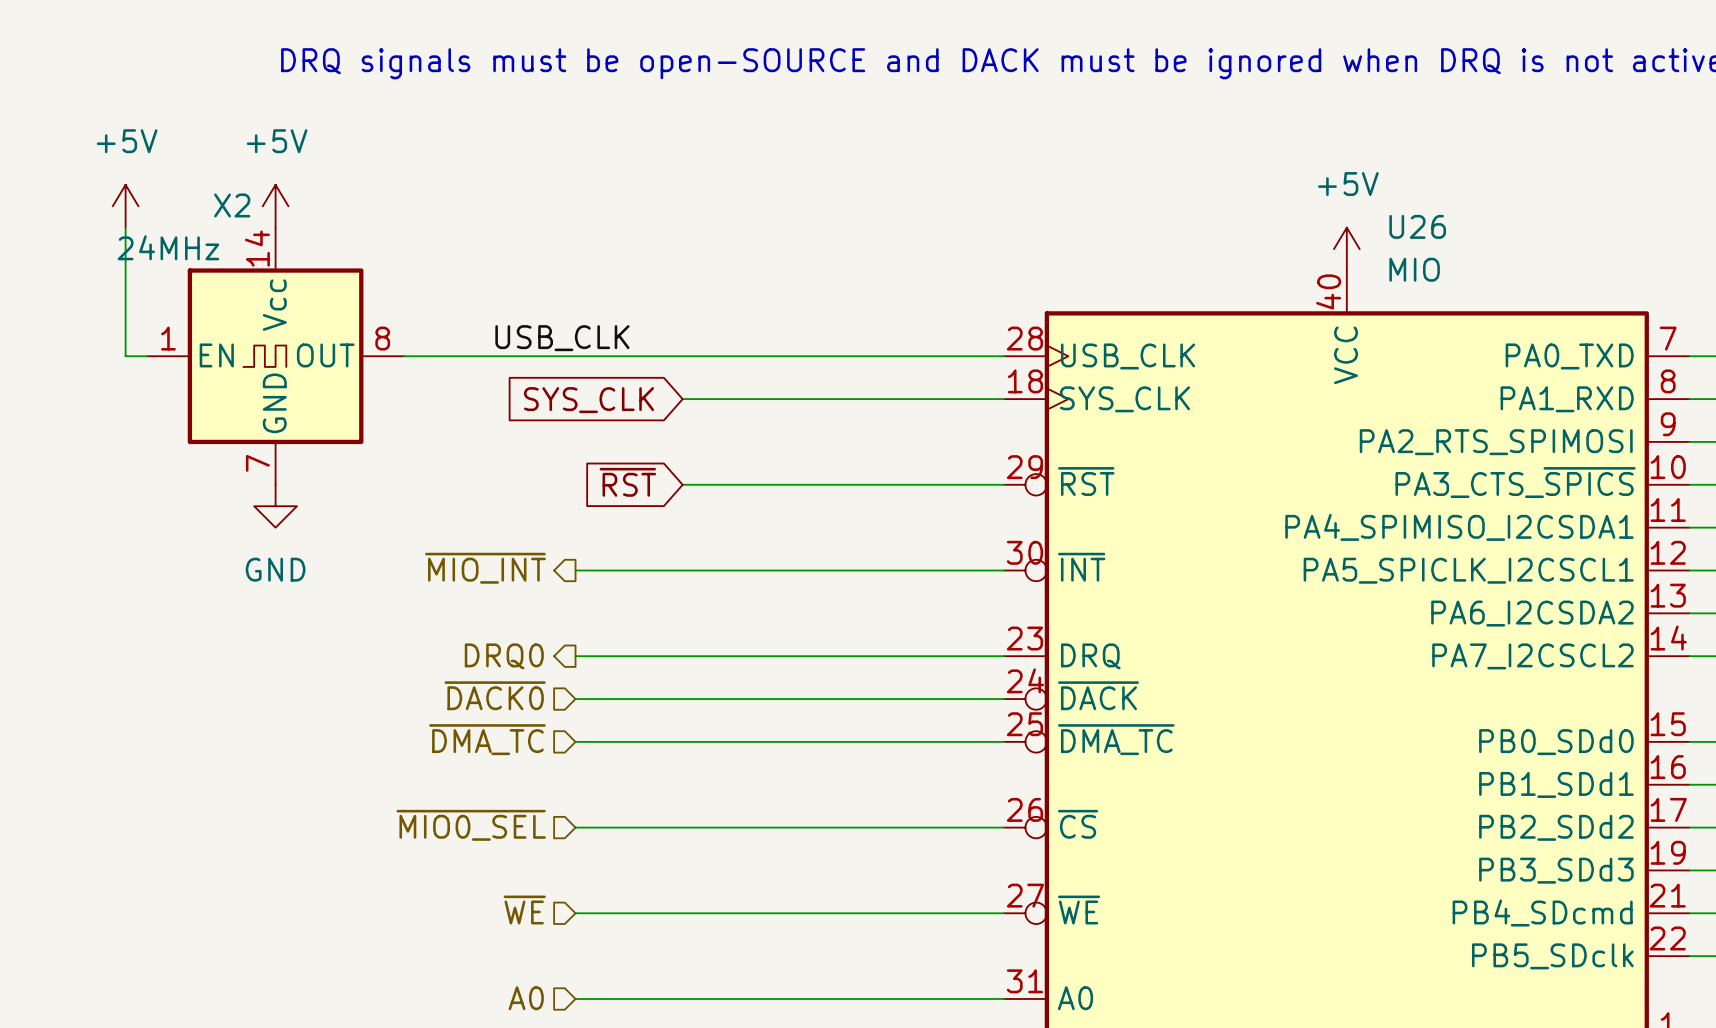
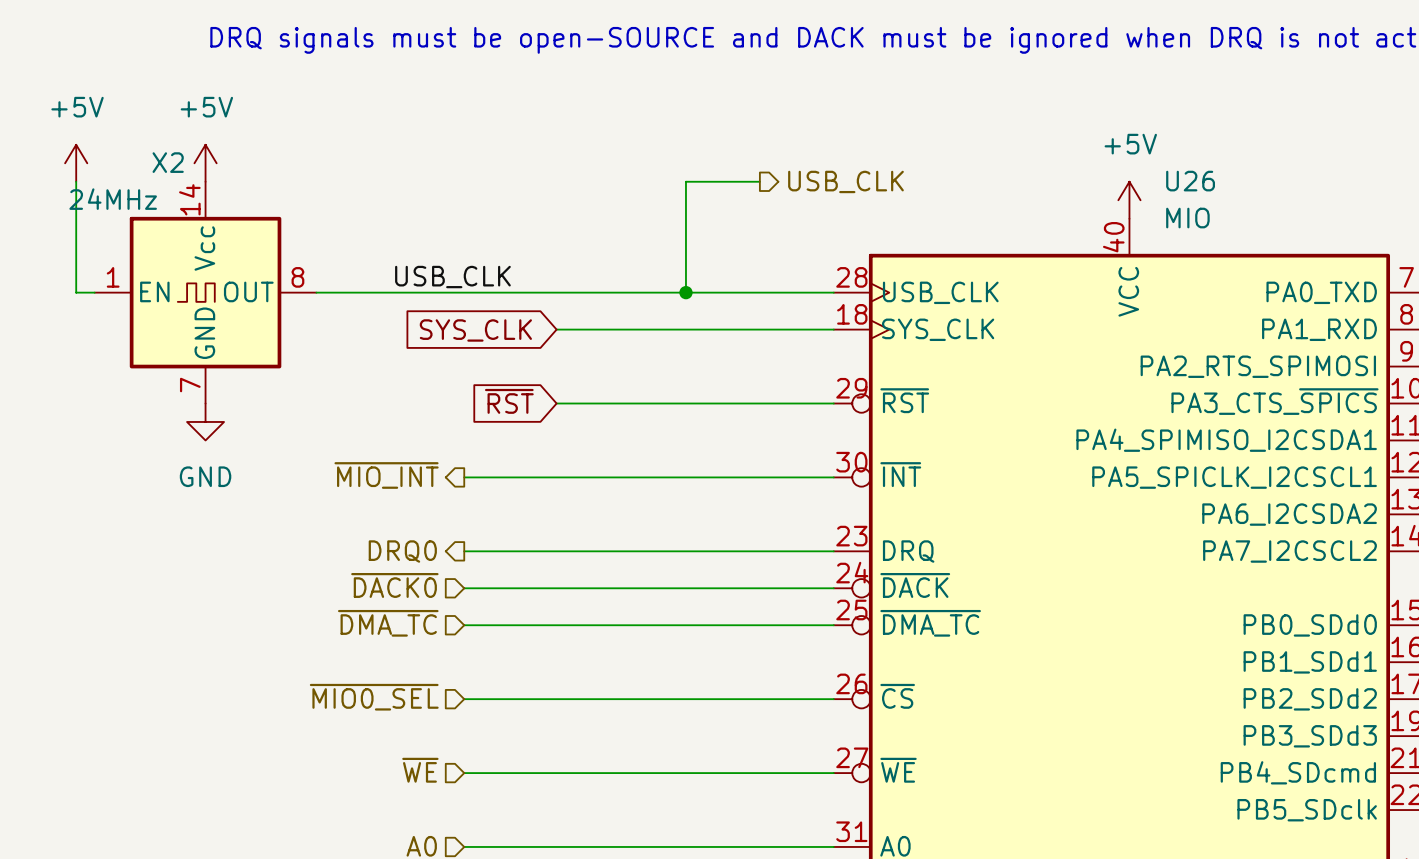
wire: none -> (759, 181) (685, 181) (685, 292)
hierarchical label: none -> USB_CLK (845, 181)
junction: none -> (685, 292)

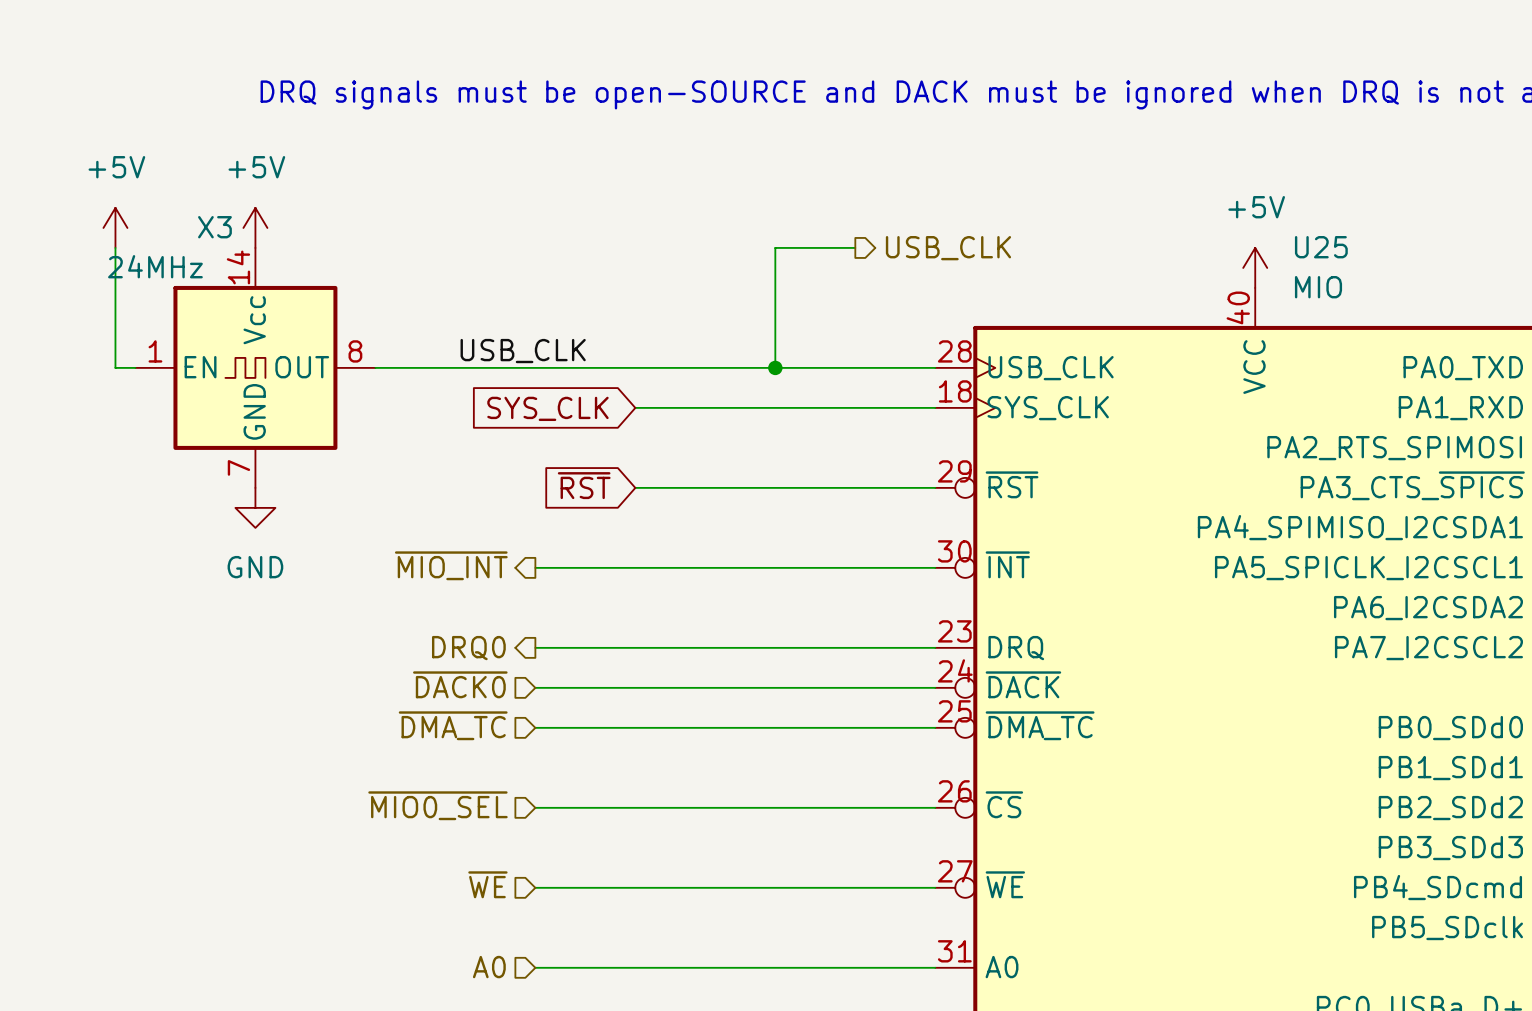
X2 name: X2 (168, 162) -> X3 (214, 227)
U26 name: U26 (1190, 181) -> U25 (1321, 247)

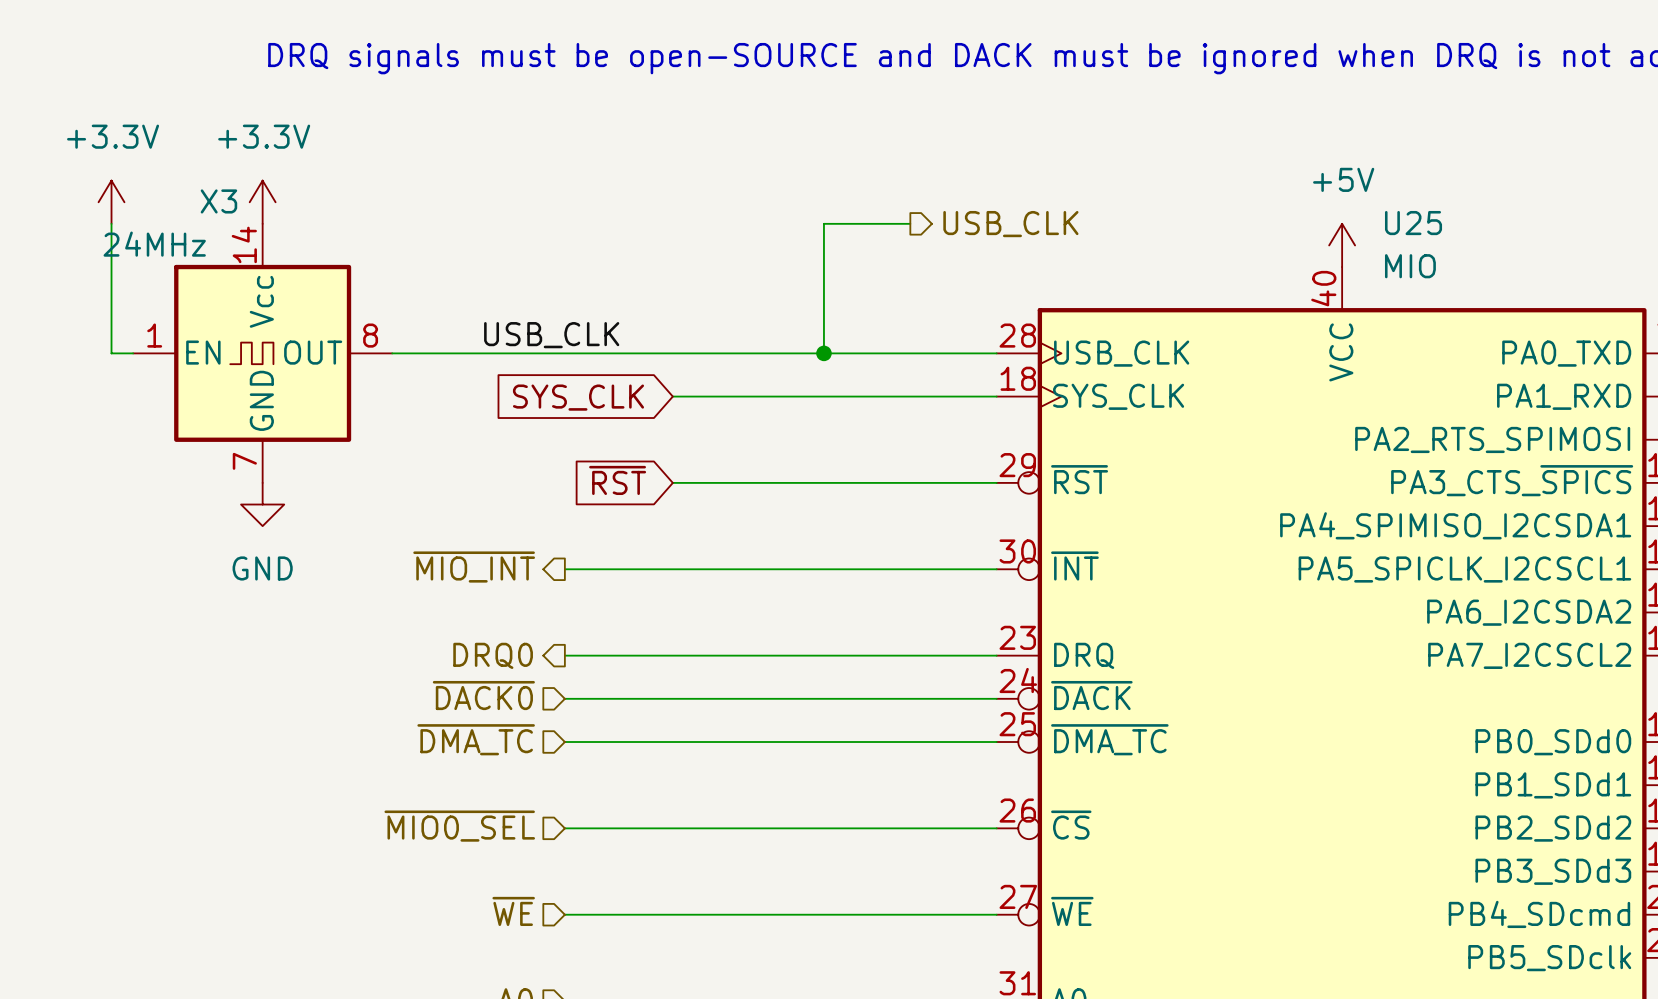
power symbol: +5V (115, 227) -> +3.3V (111, 202)
power symbol: +5V (255, 227) -> +3.3V (262, 202)

